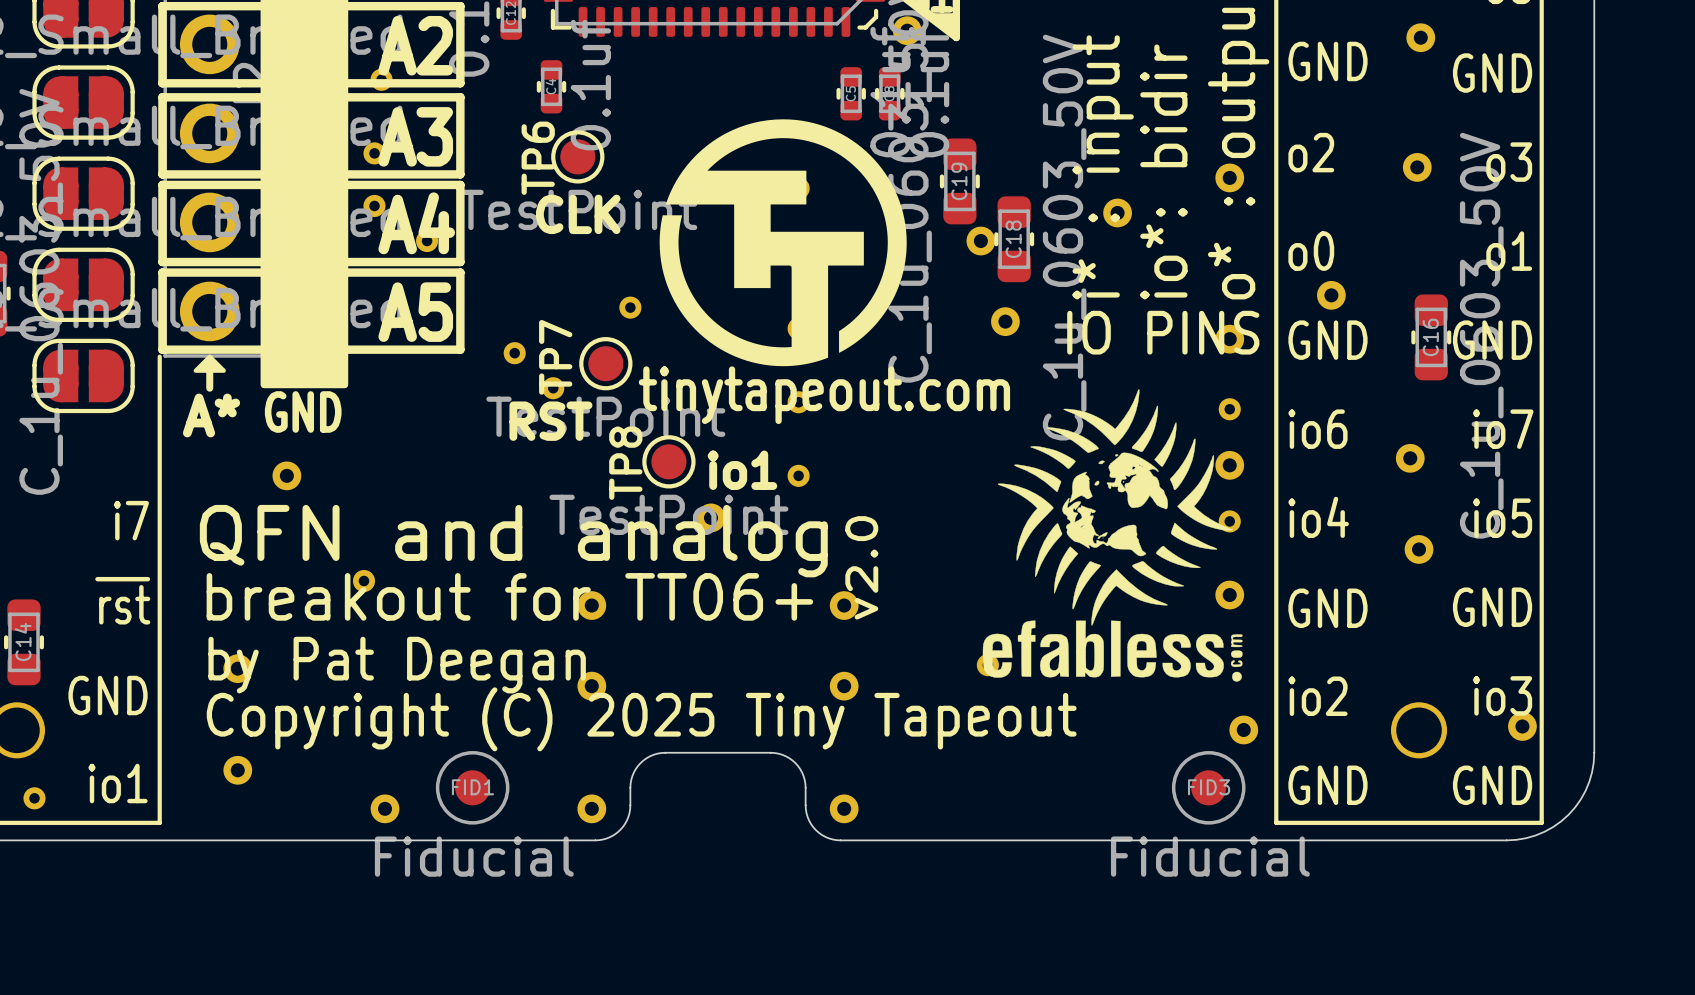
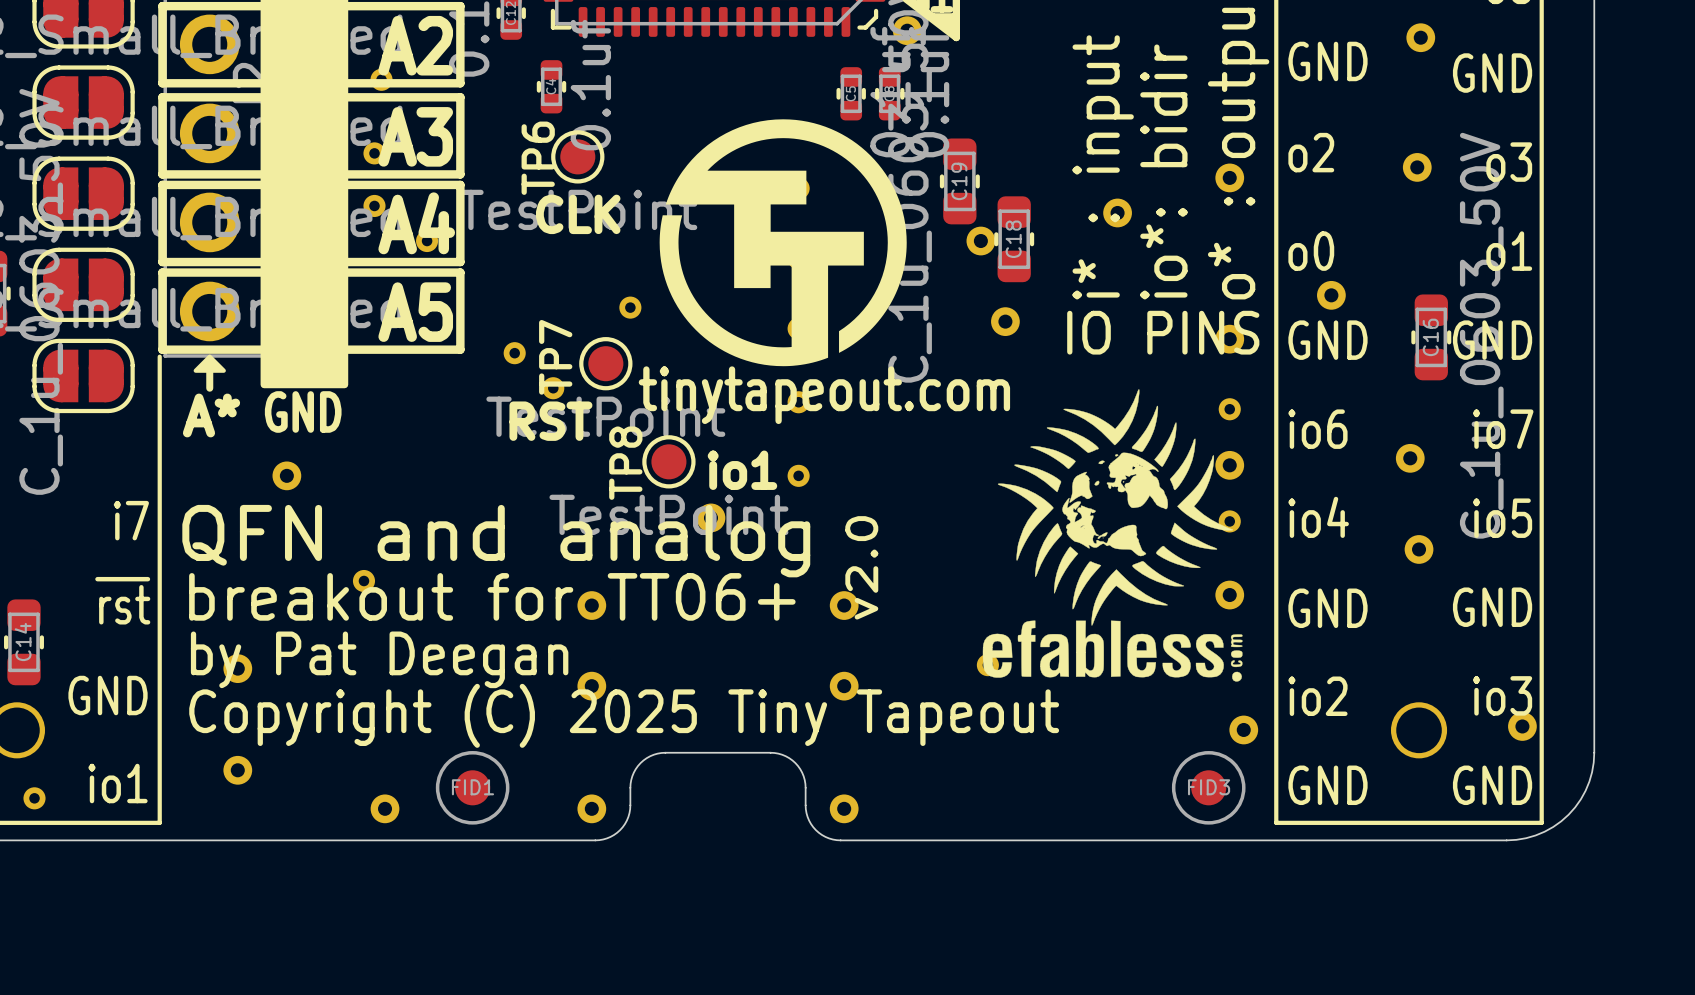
C18 value: C_1u_0603_50V (1064, 237) -> none
text position: QFN and analog (513, 541) -> QFN and analog (496, 541)
text position: breakout for TT06+ (509, 596) -> breakout for TT06+ (492, 596)
text position: by Pat Deegan (397, 665) -> by Pat Deegan (379, 659)
text position: Copyright (C) 2025 Tiny Tapeout (641, 719) -> Copyright (C) 2025 Tiny Tapeout (624, 715)
FID1 value: Fiducial (474, 856) -> none
FID3 value: Fiducial (1210, 856) -> none

